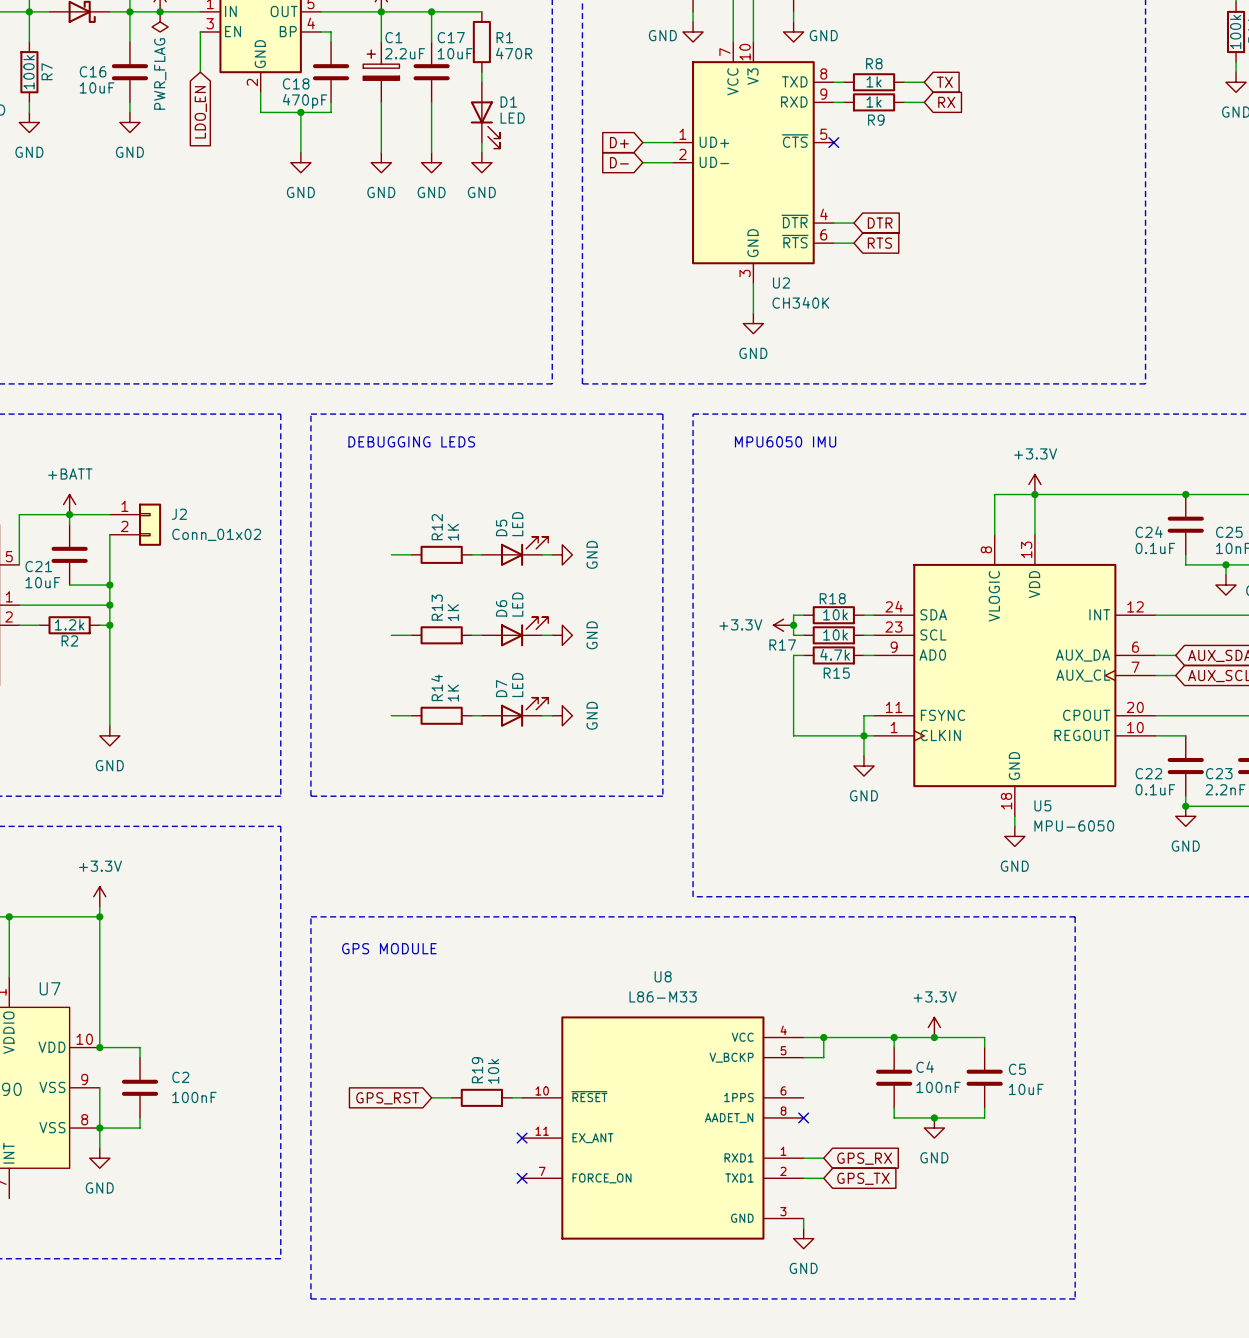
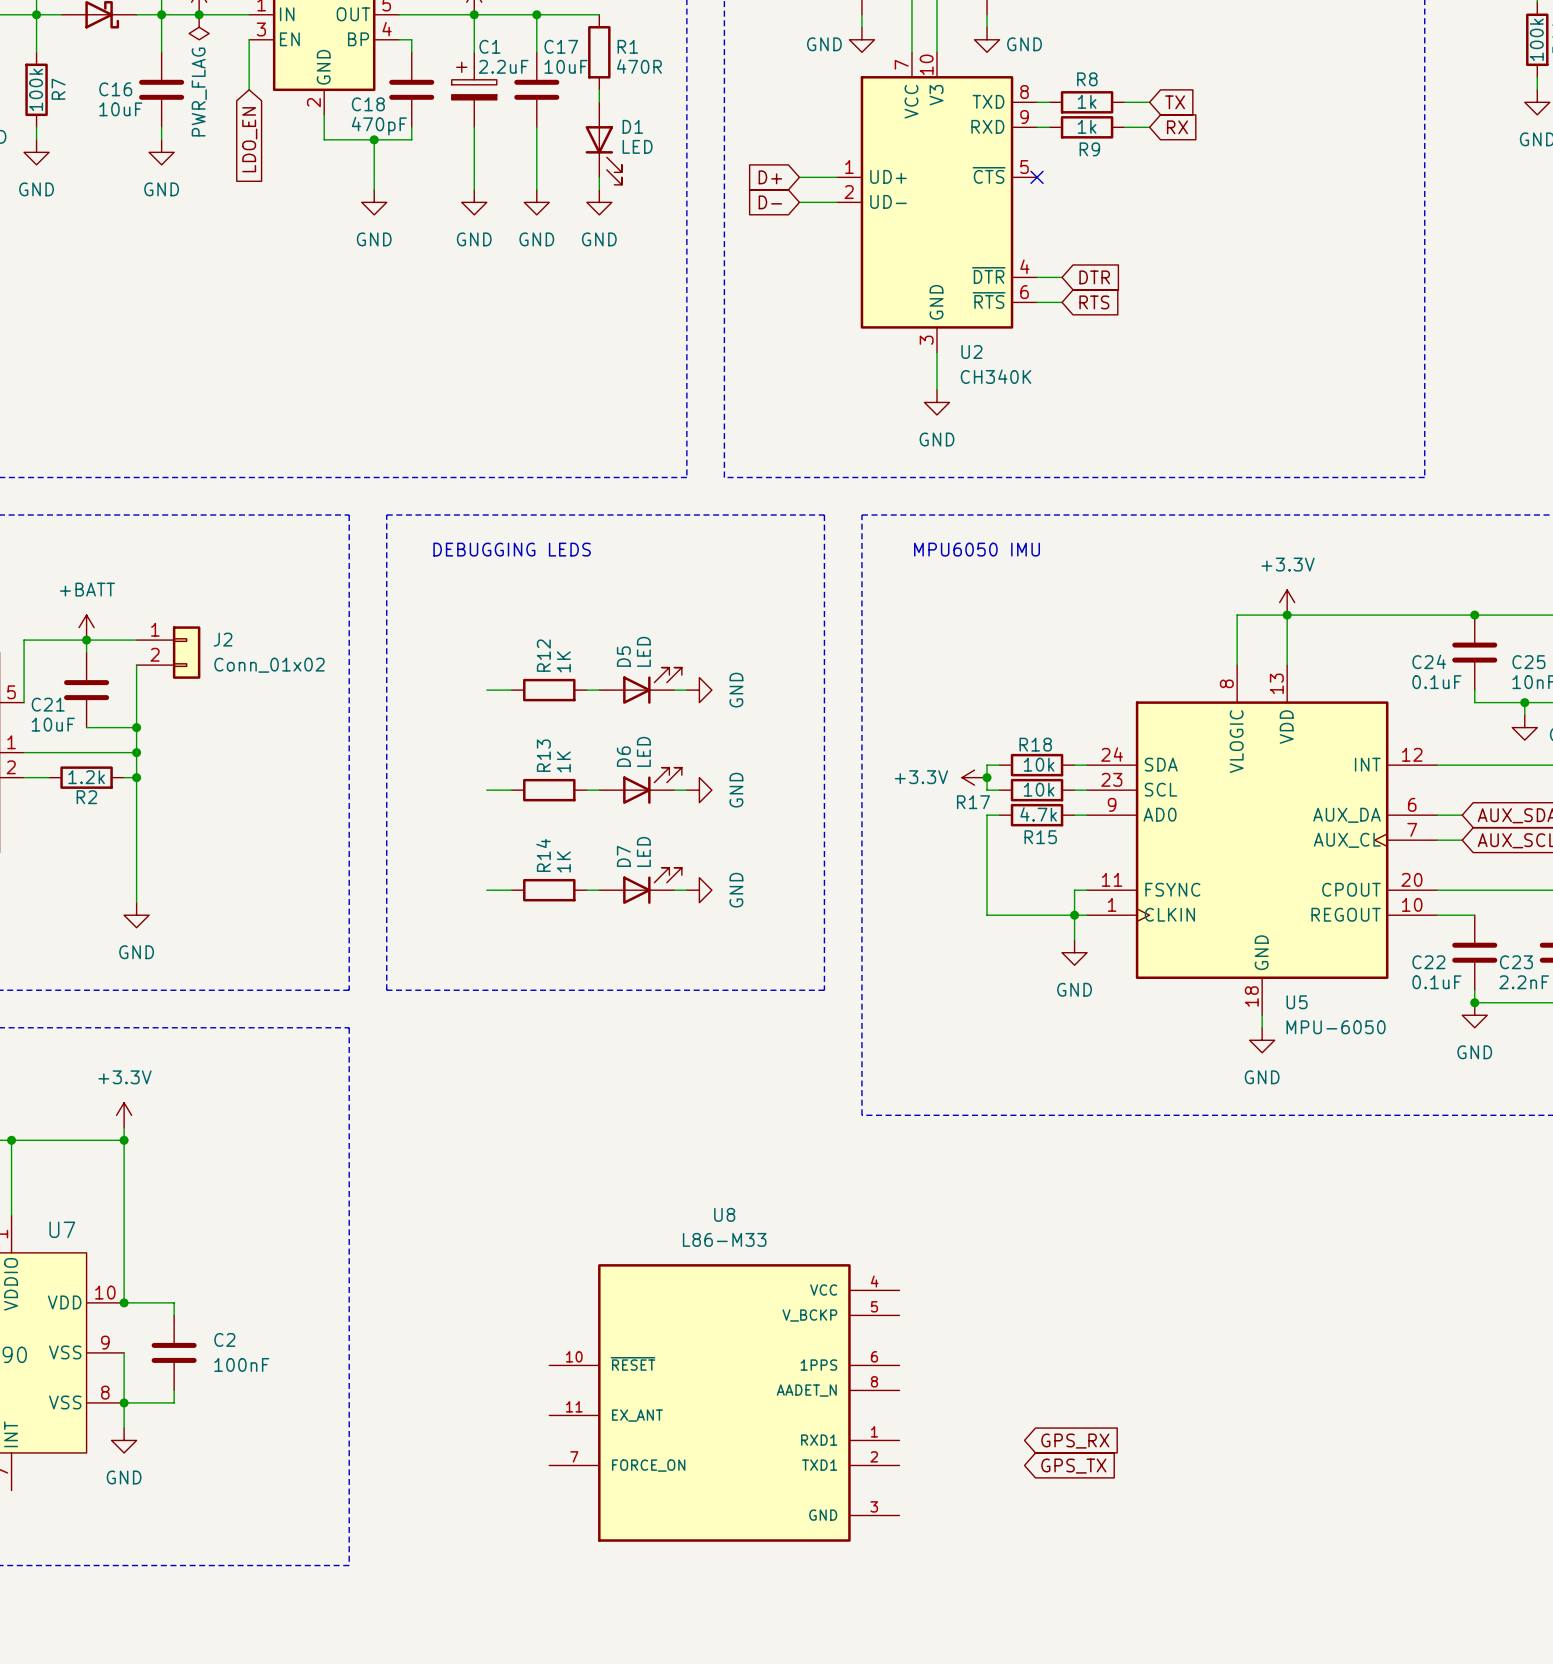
line: (310, 916) (1075, 916) (1075, 1298) (310, 1298) (310, 916) -> none
text: GPS MODULE (389, 948) -> none
power symbol: +3.3V (934, 1027) -> none
wire: (803, 1037) (984, 1037) (984, 1047) -> none
wire: (823, 1037) (823, 1057) (803, 1057) -> none
junction: (823, 1037) -> none
wire: (894, 1037) (894, 1047) -> none
junction: (894, 1037) -> none
junction: (934, 1037) -> none
C4: 100nF (894, 1077) -> none
C5: 10uF (984, 1077) -> none
wire: (431, 1097) (451, 1097) -> none
R19: 10k (481, 1097) -> none
global label: GPS_RST (387, 1098) -> none
wire: (894, 1107) (894, 1117) (984, 1117) (984, 1107) -> none
no-connect mark: (803, 1117) -> none
junction: (934, 1117) -> none
U8 position: (662, 1128) -> (724, 1402)
power symbol: GND (934, 1128) -> none
no-connect mark: (522, 1138) -> none
wire: (803, 1158) (823, 1158) -> none
no-connect mark: (522, 1178) -> none
wire: (803, 1178) (823, 1178) -> none
wire: (803, 1218) (803, 1228) -> none
power symbol: GND (803, 1238) -> none

